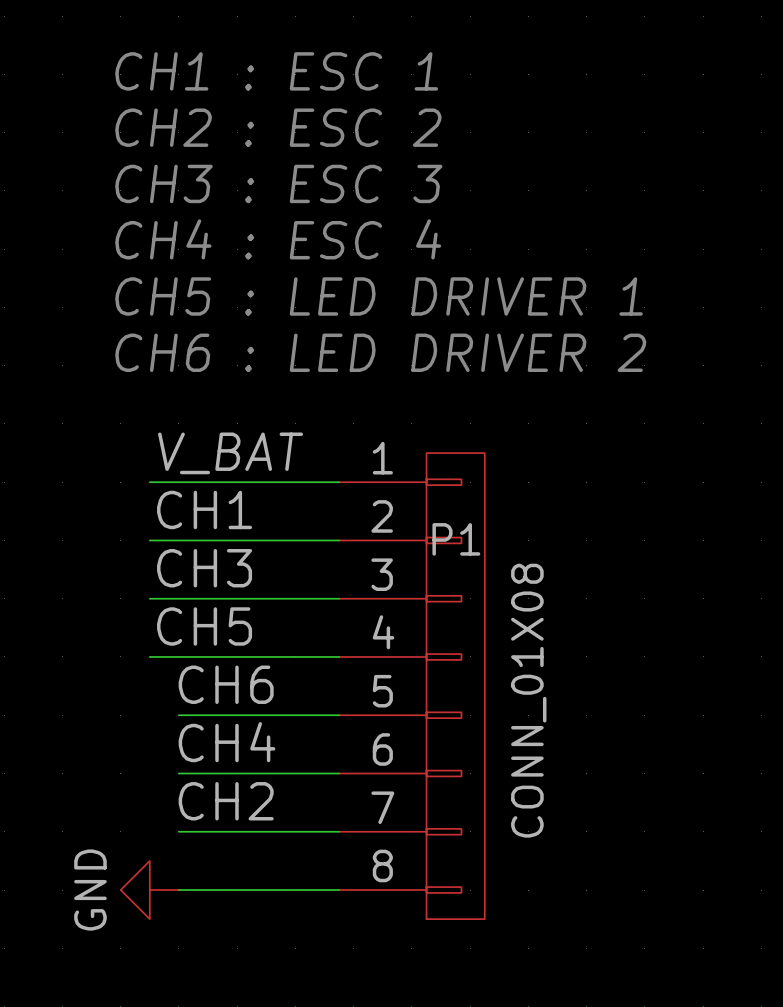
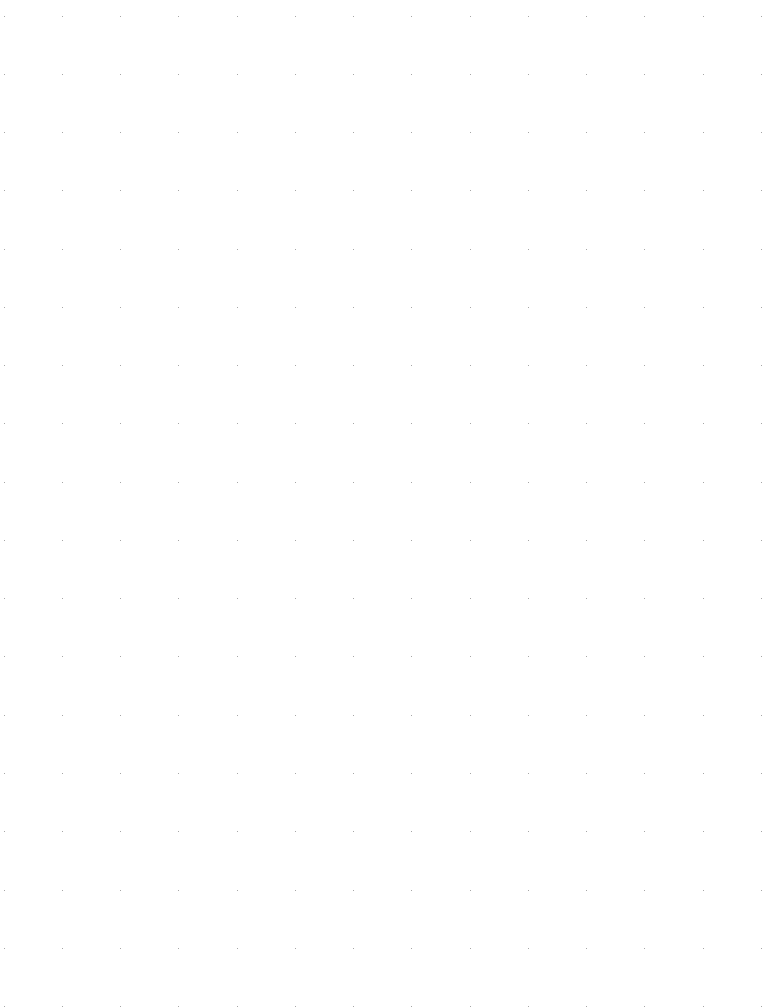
text: CH1 : ESC 1 (276, 71) -> none
text: CH2 : ESC 2 (278, 127) -> none
text: CH3 : ESC 3 (278, 183) -> none
text: CH4 : ESC 4 (278, 239) -> none
text: CH5 : LED DRIVER 1 (379, 296) -> none
text: CH6 : LED DRIVER 2 (380, 352) -> none
label: V_BAT (230, 453) -> none
wire: (149, 482) (339, 482) -> none
label: CH1 (204, 509) -> none
wire: (149, 540) (339, 540) -> none
label: CH3 (204, 568) -> none
wire: (149, 598) (339, 598) -> none
label: CH5 (204, 626) -> none
wire: (149, 656) (339, 656) -> none
label: CH6 (226, 684) -> none
P1: CONN_01X08 (411, 686) -> none
wire: (178, 715) (339, 715) -> none
label: CH4 (226, 742) -> none
wire: (178, 773) (339, 773) -> none
label: CH2 (226, 801) -> none
wire: (178, 831) (339, 831) -> none
power symbol: GND (149, 890) -> none
wire: (178, 890) (339, 890) -> none

